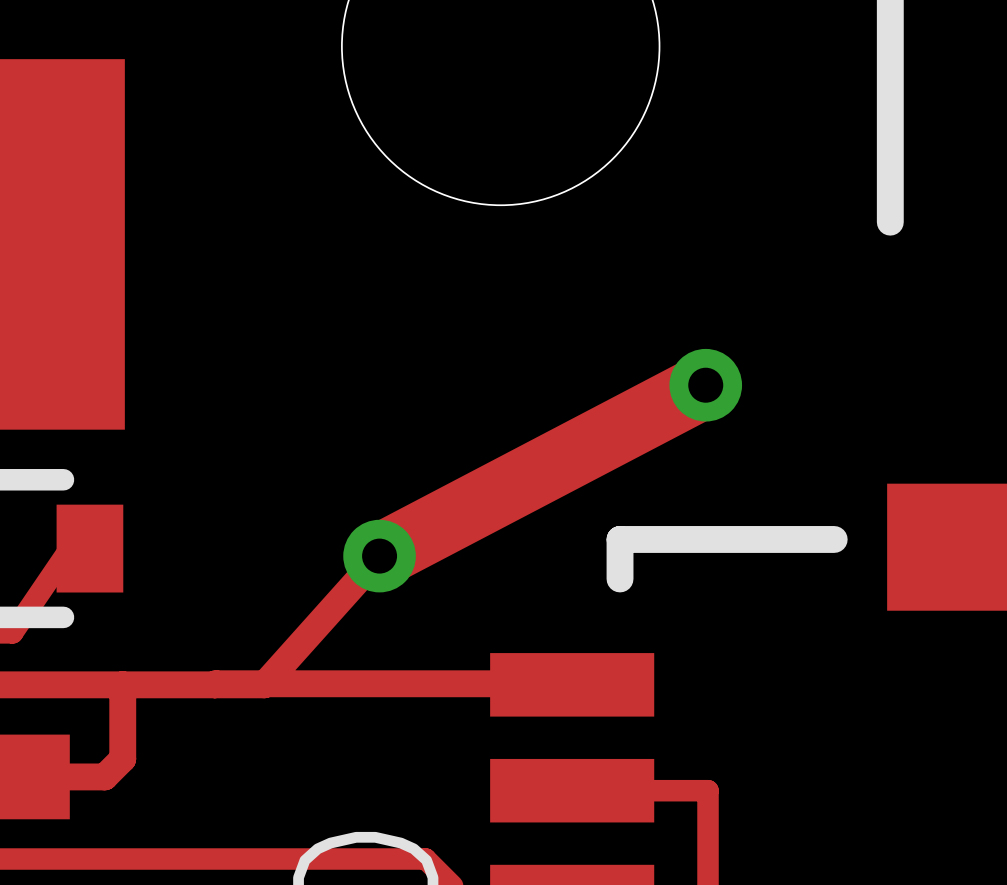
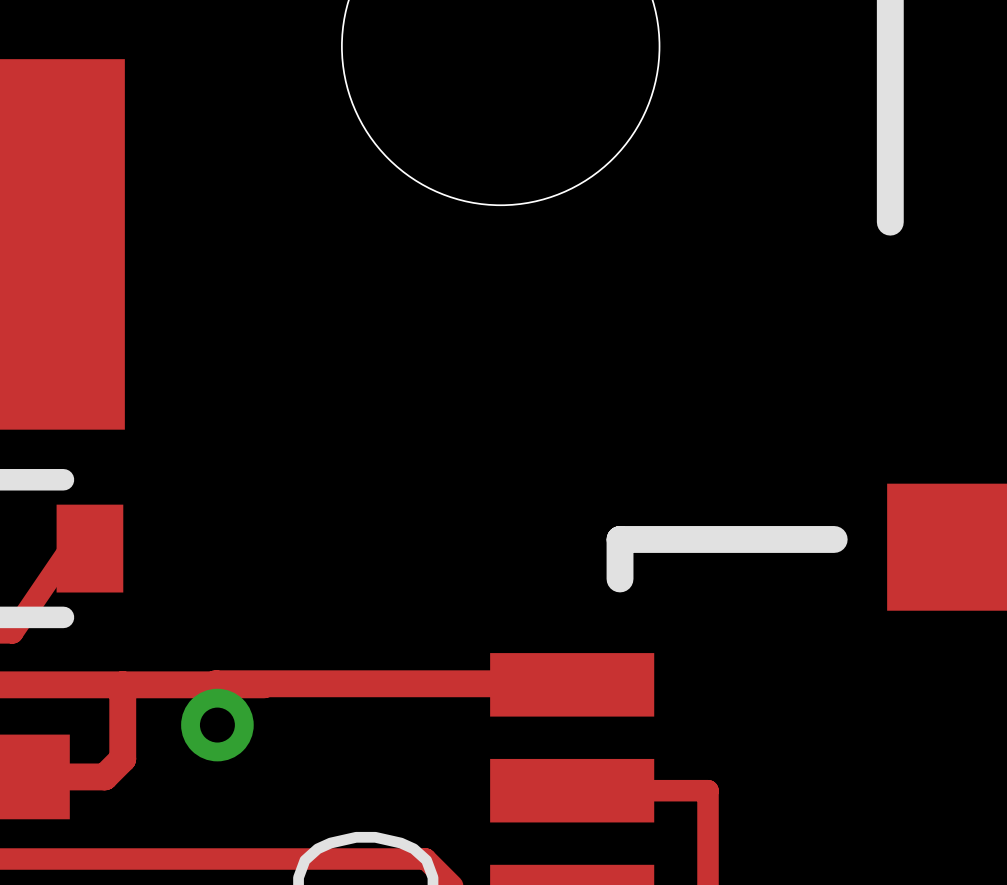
track: (705, 385) (379, 556) (264, 684) -> none
via: (705, 385) -> none
via position: (379, 556) -> (217, 725)

